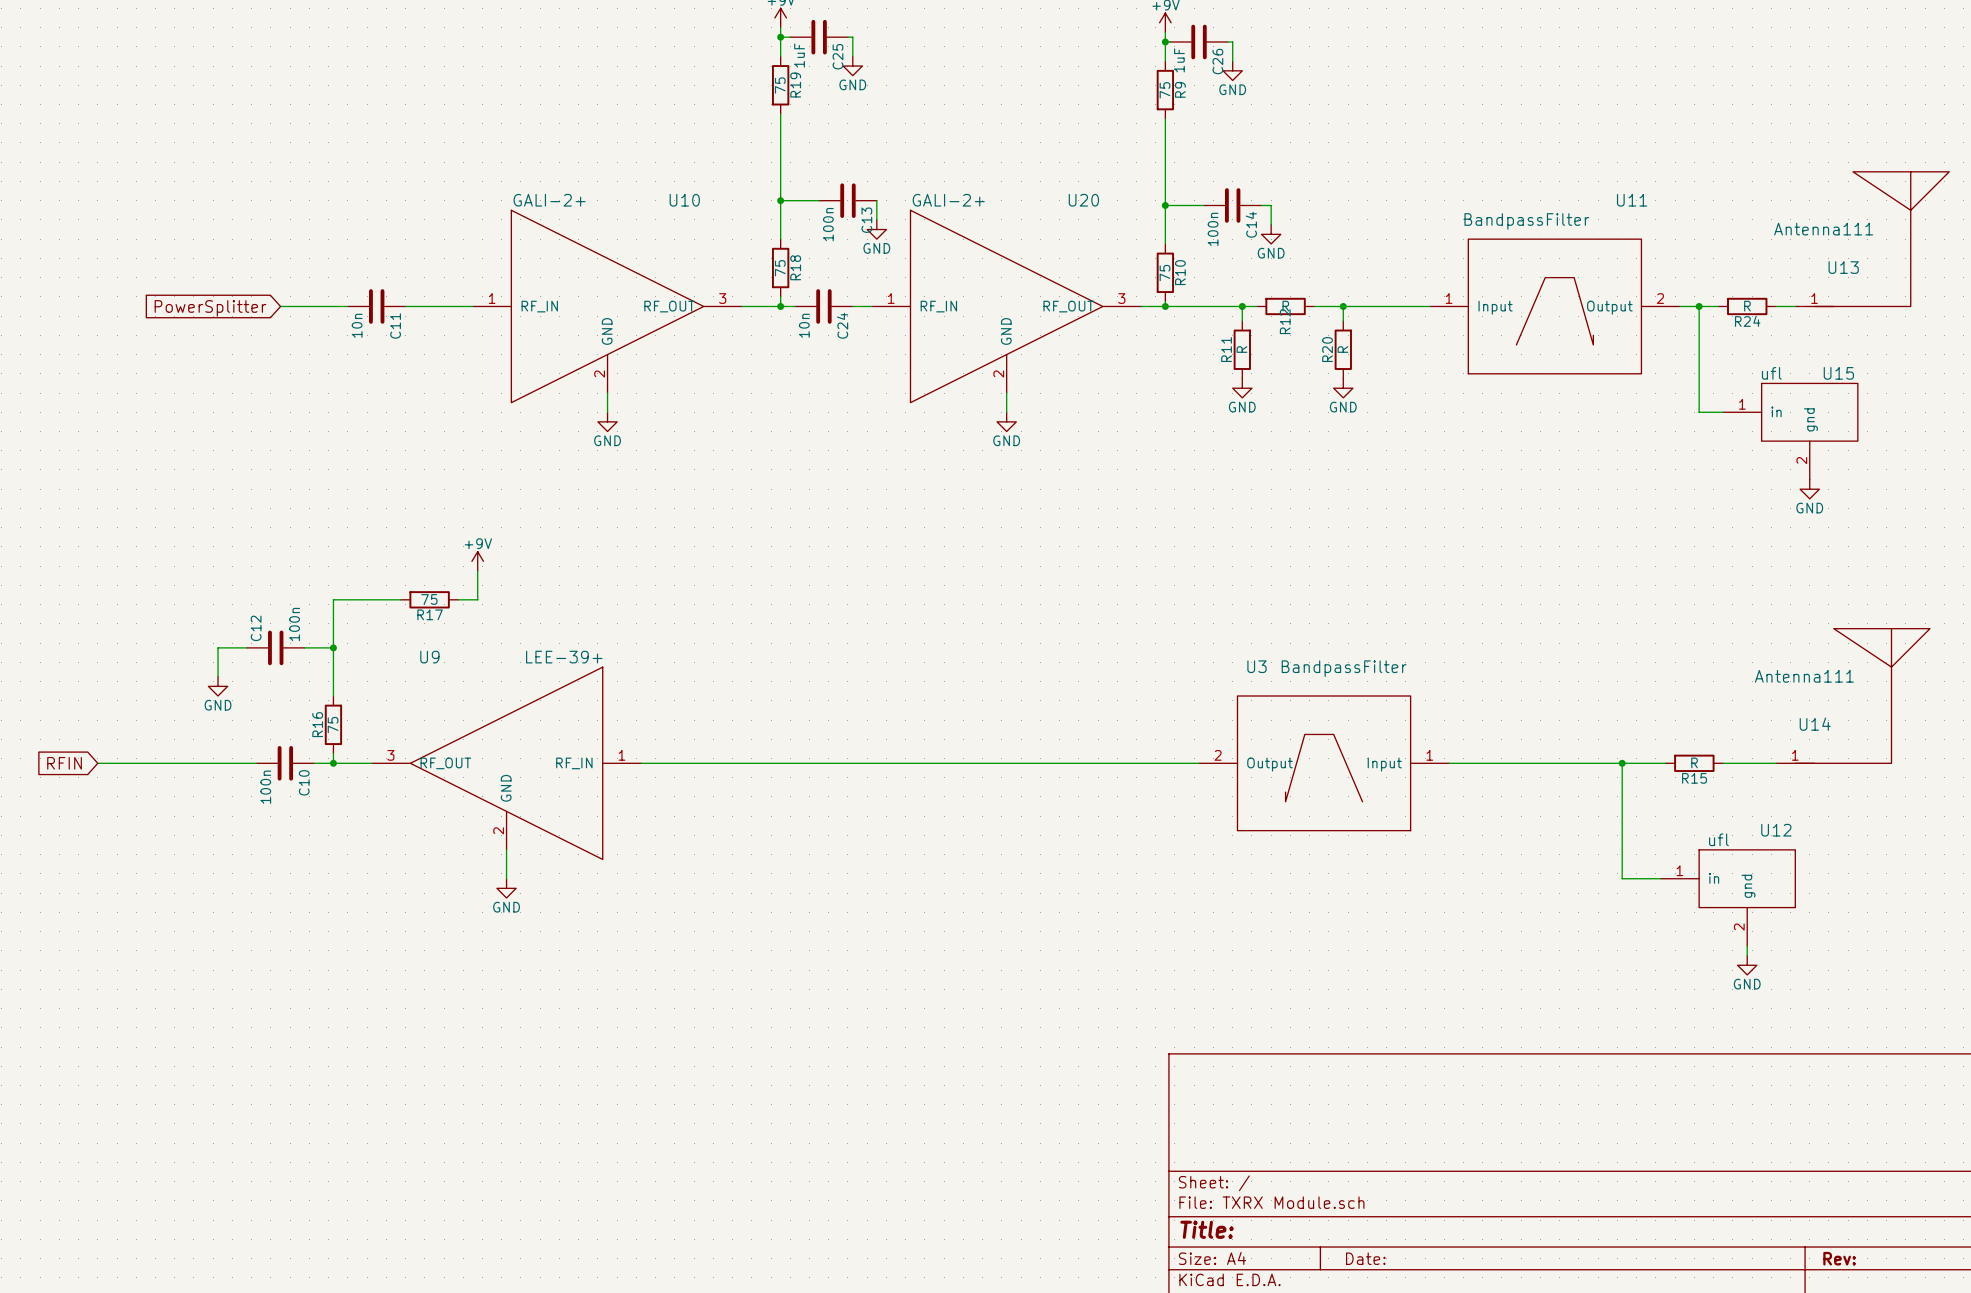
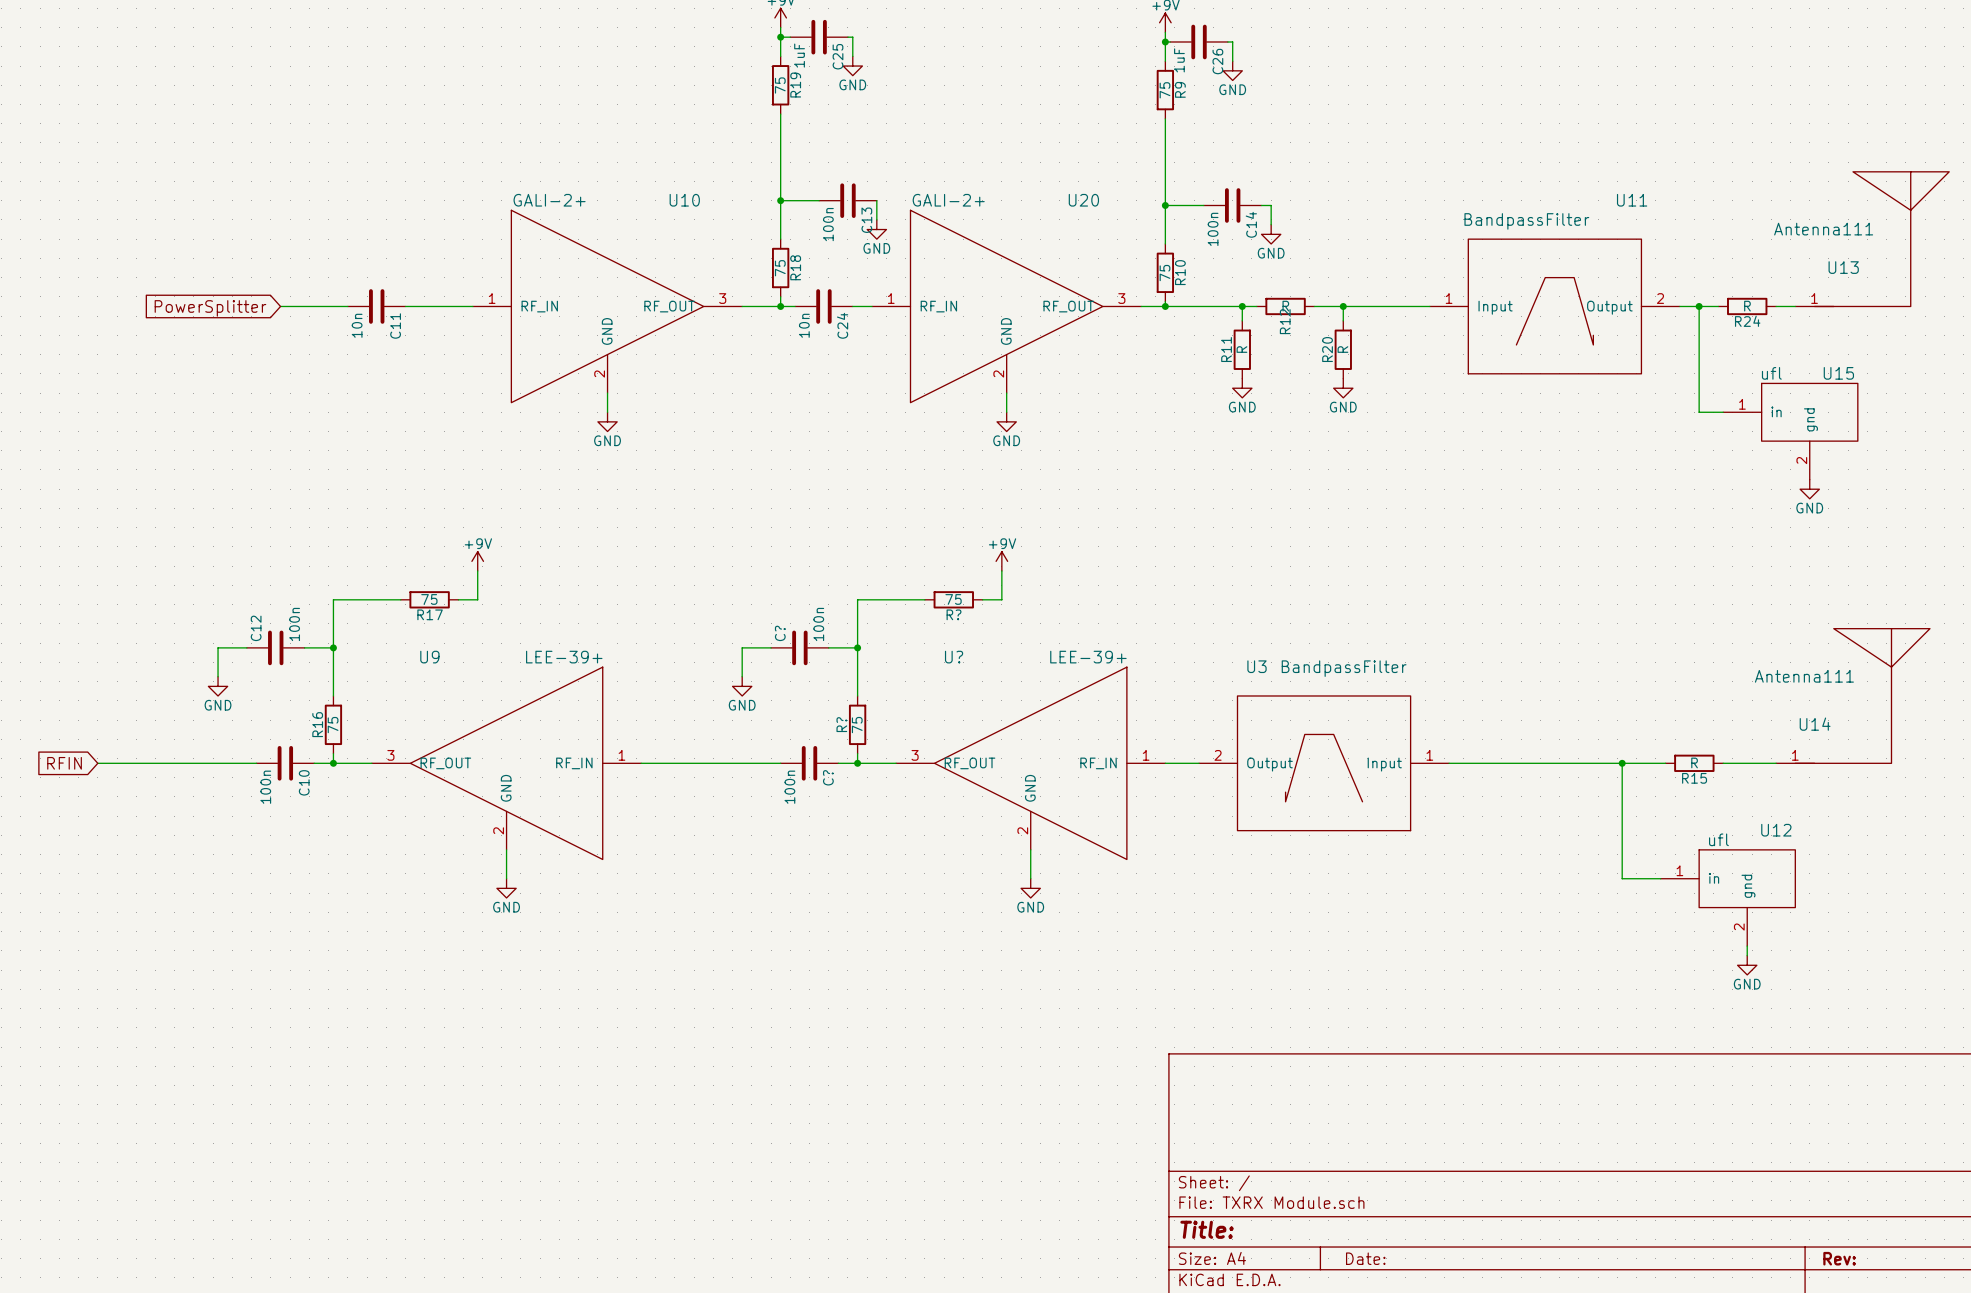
power symbol: none -> +9V (1001, 561)
wire: none -> (1001, 570) (1001, 599) (982, 599)
wire: none -> (924, 599) (857, 599) (857, 695)
R?: none -> 75 (953, 599)
wire: none -> (771, 647) (742, 647) (742, 676)
C?: none -> 100n (799, 647)
wire: none -> (828, 647) (857, 647)
junction: none -> (857, 647)
power symbol: none -> GND (742, 686)
R?: none -> 75 (857, 724)
wire: none -> (857, 753) (857, 763)
C?: none -> 100n (809, 763)
junction: none -> (857, 763)
wire: (896, 763) (1165, 763) -> none
U?: none -> LEE-39+ (1030, 763)
wire: none -> (1030, 849) (1030, 878)
power symbol: none -> GND (1030, 888)

